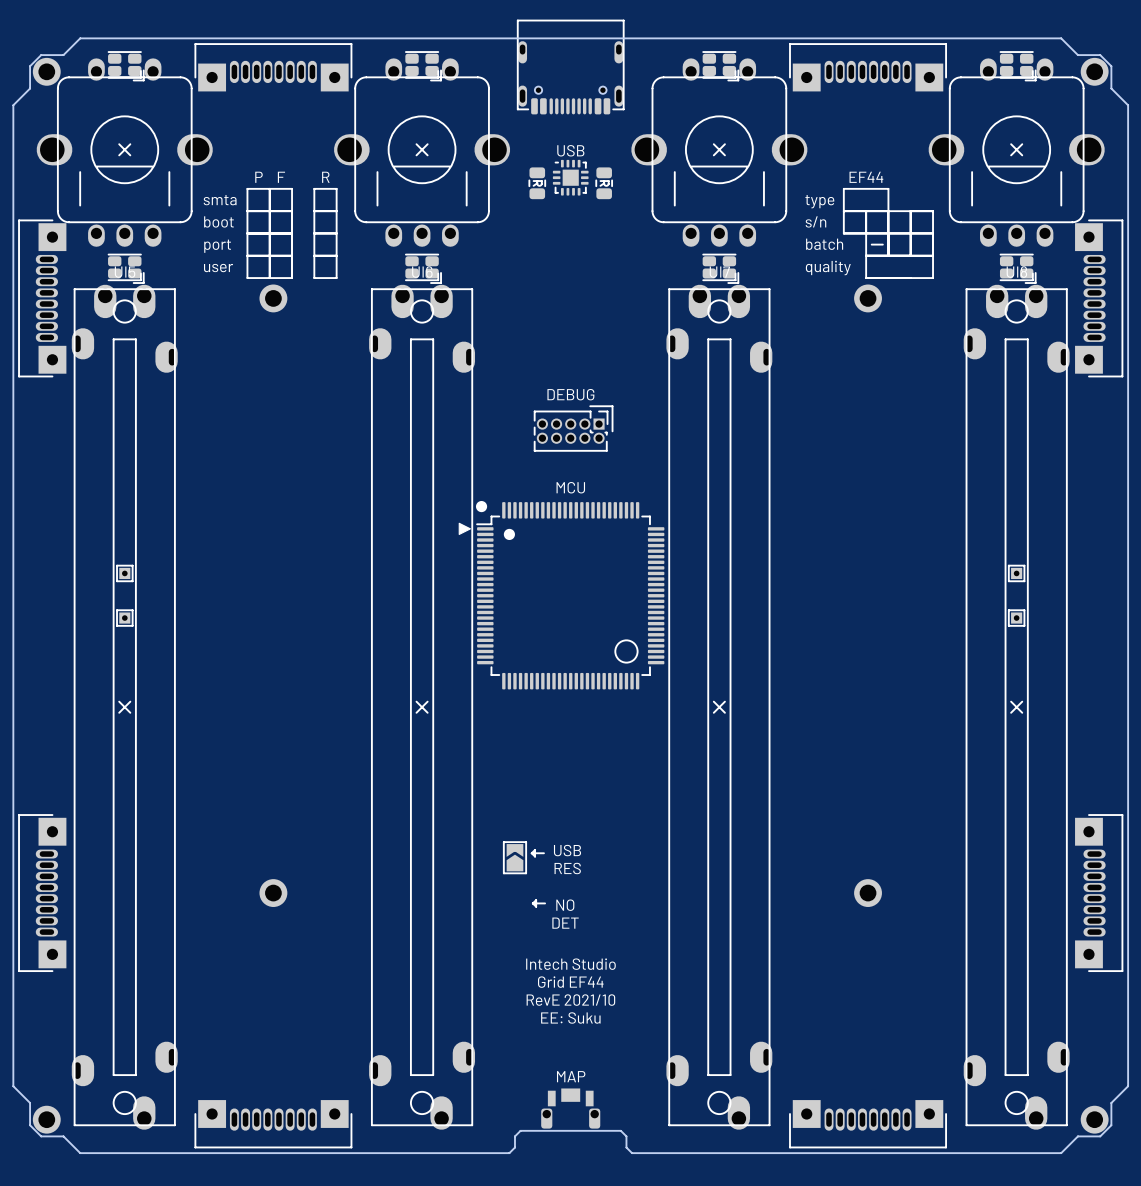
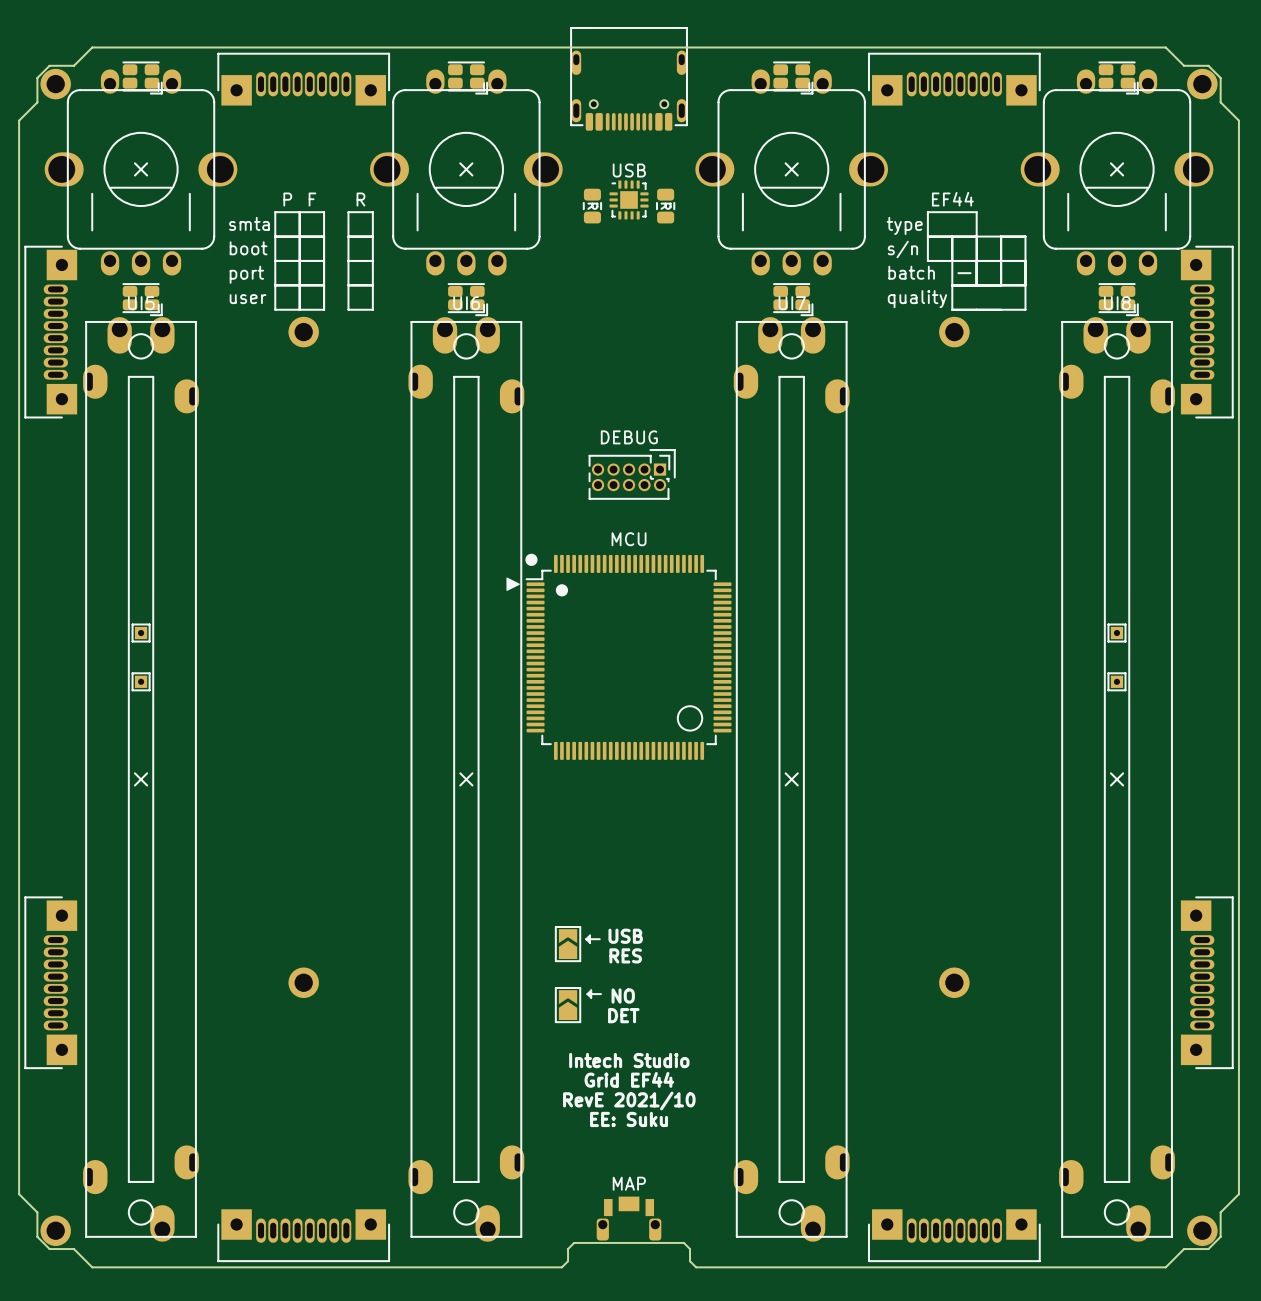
part: none -> (568, 1005)

